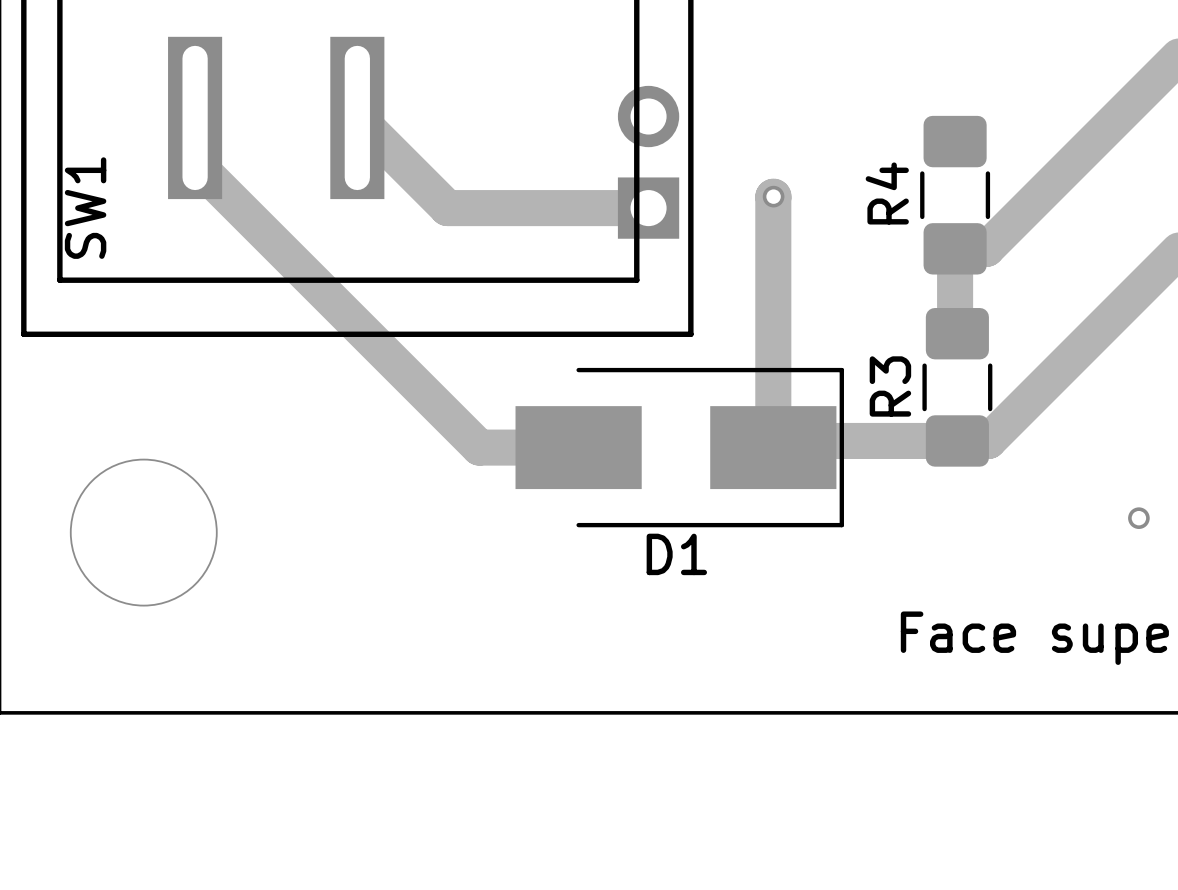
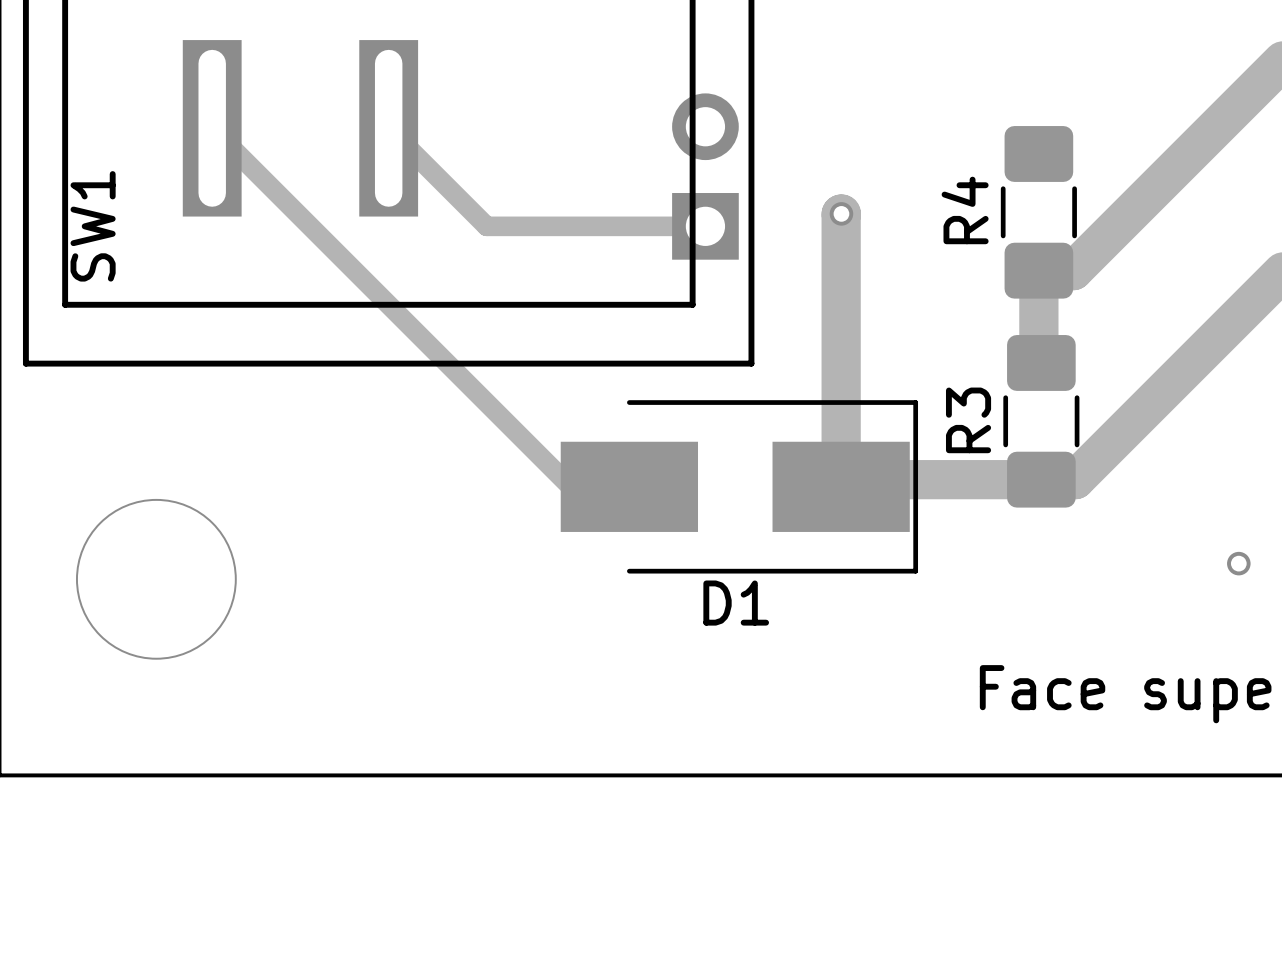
track: (195, 117) (195, 163) (479, 447) (578, 447) -> (212, 128) (570, 486)
track width: thick (357, 117) (447, 208) (648, 208) -> thin (388, 128) (486, 226) (705, 226)

